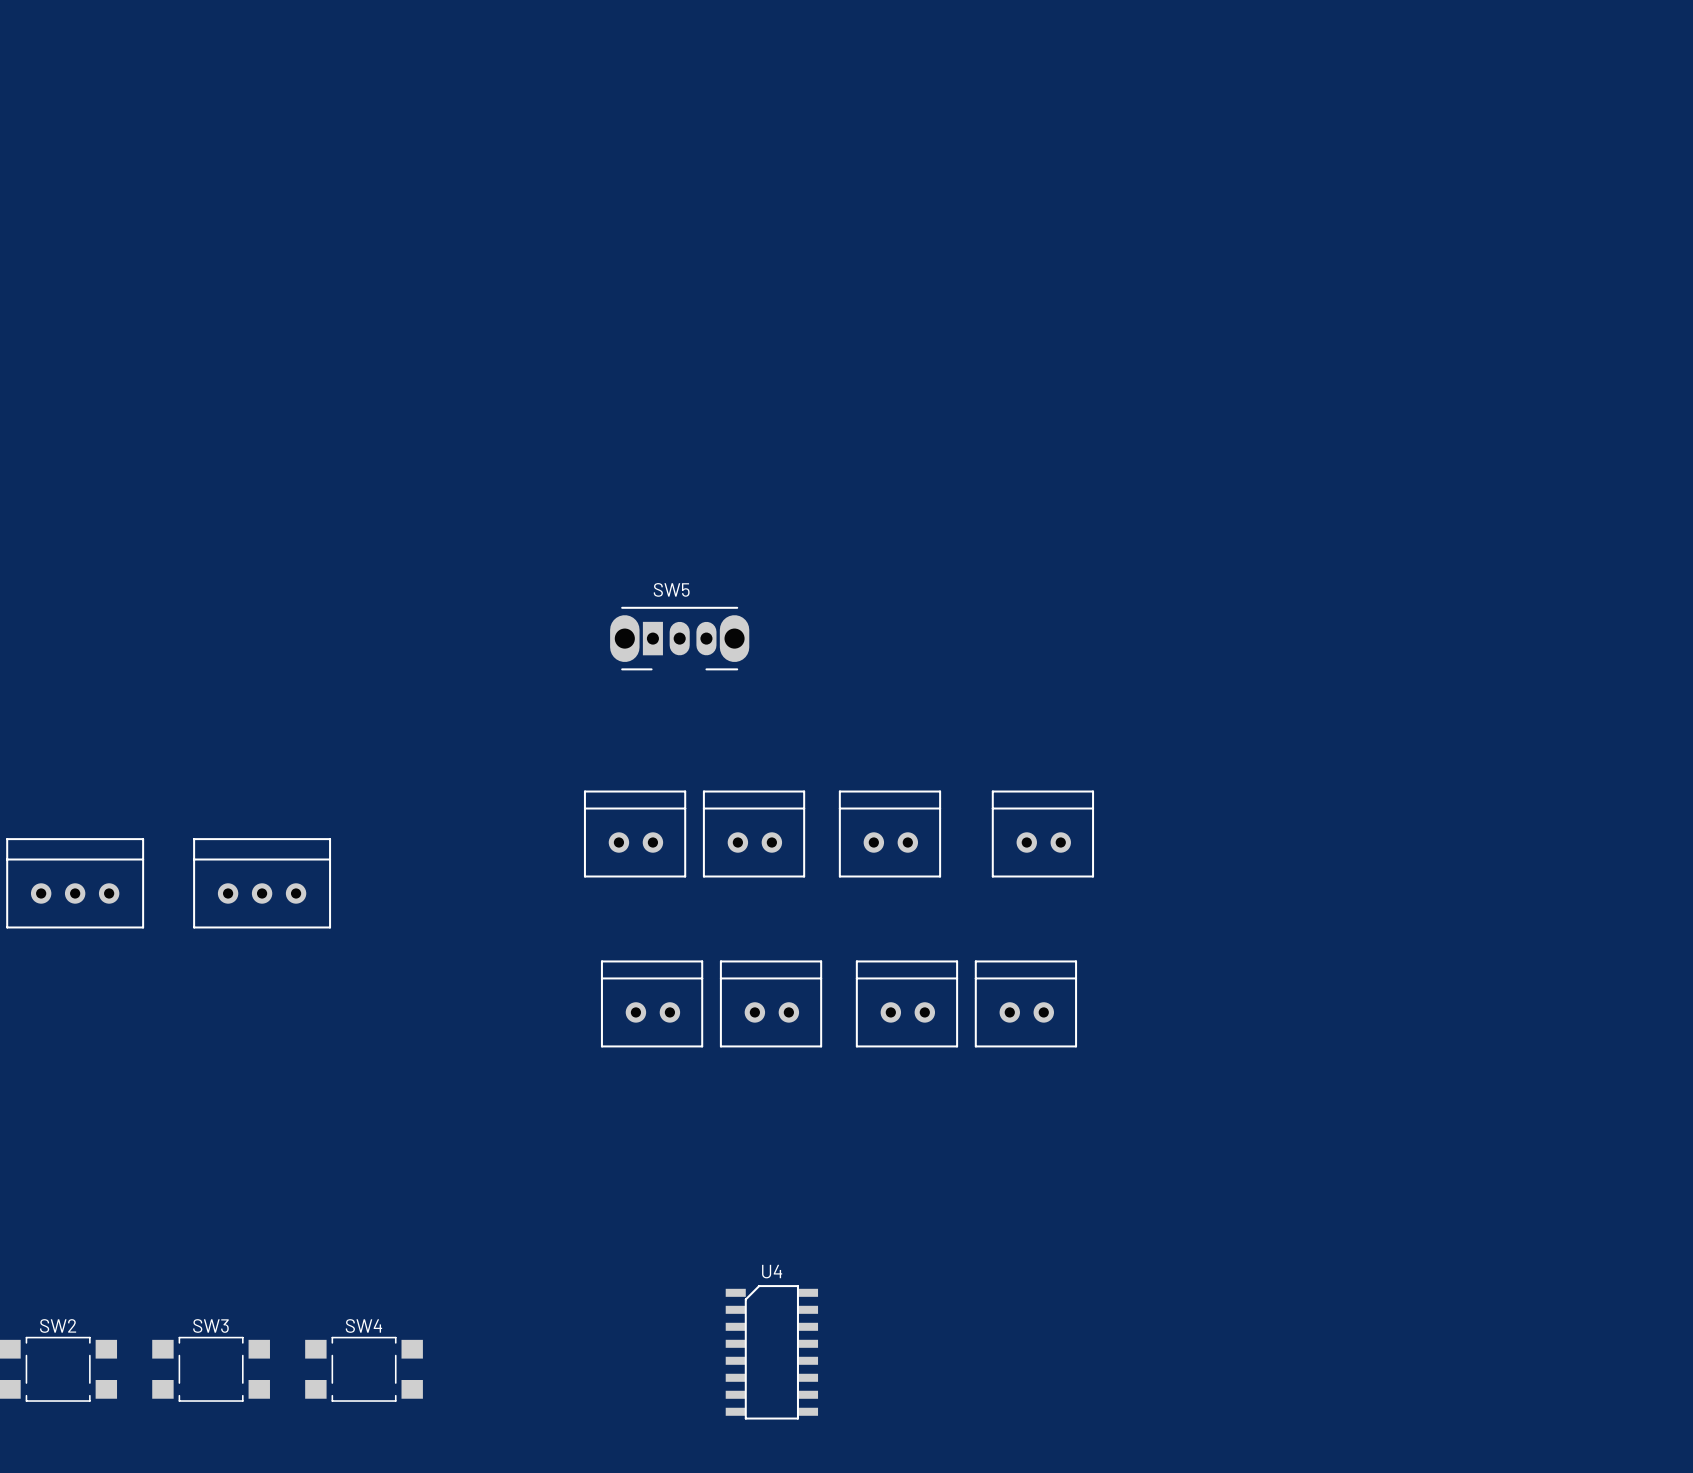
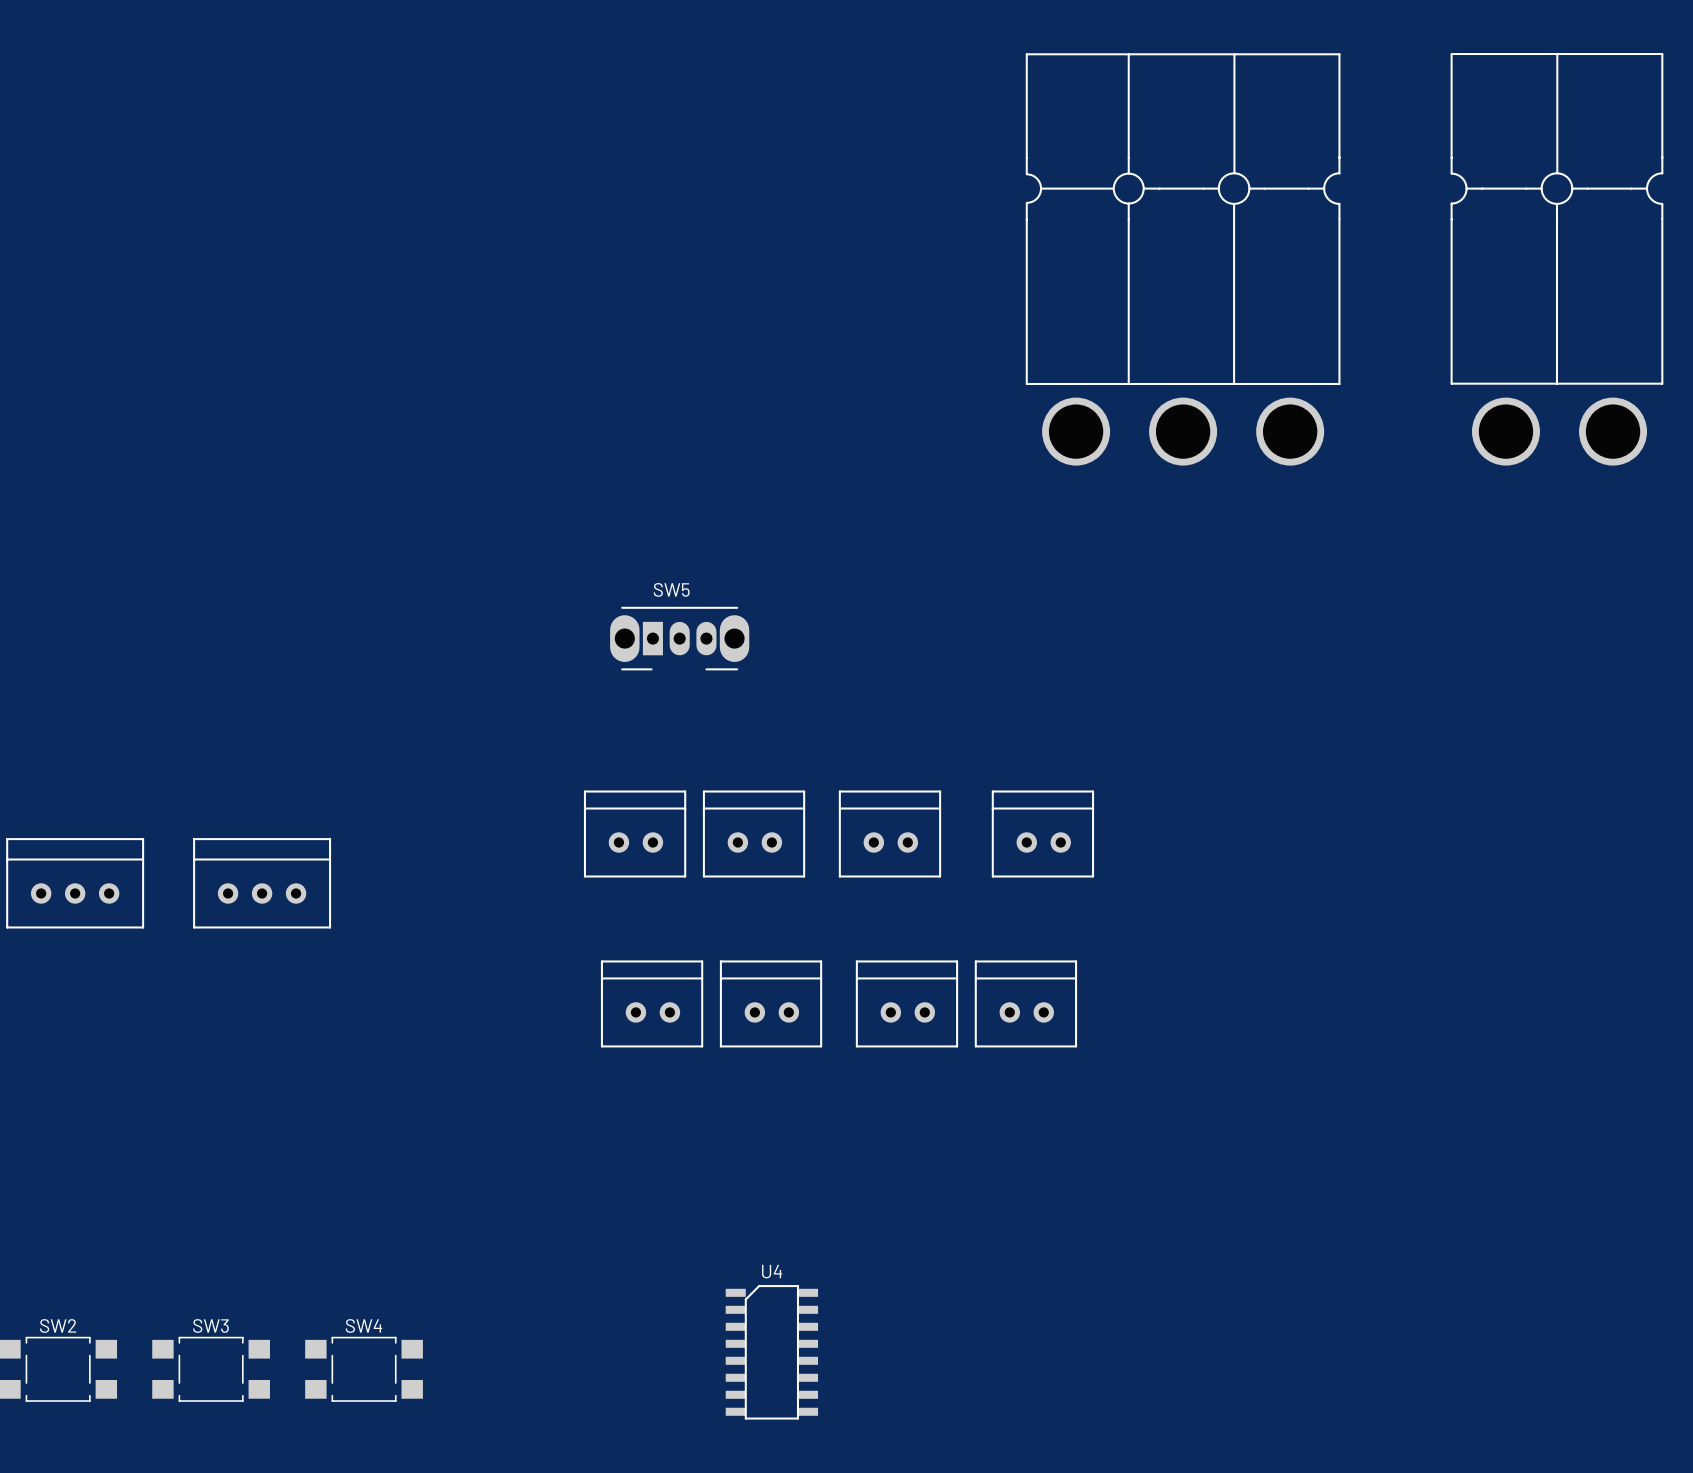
part: none -> (1183, 259)
part: none -> (1556, 259)

